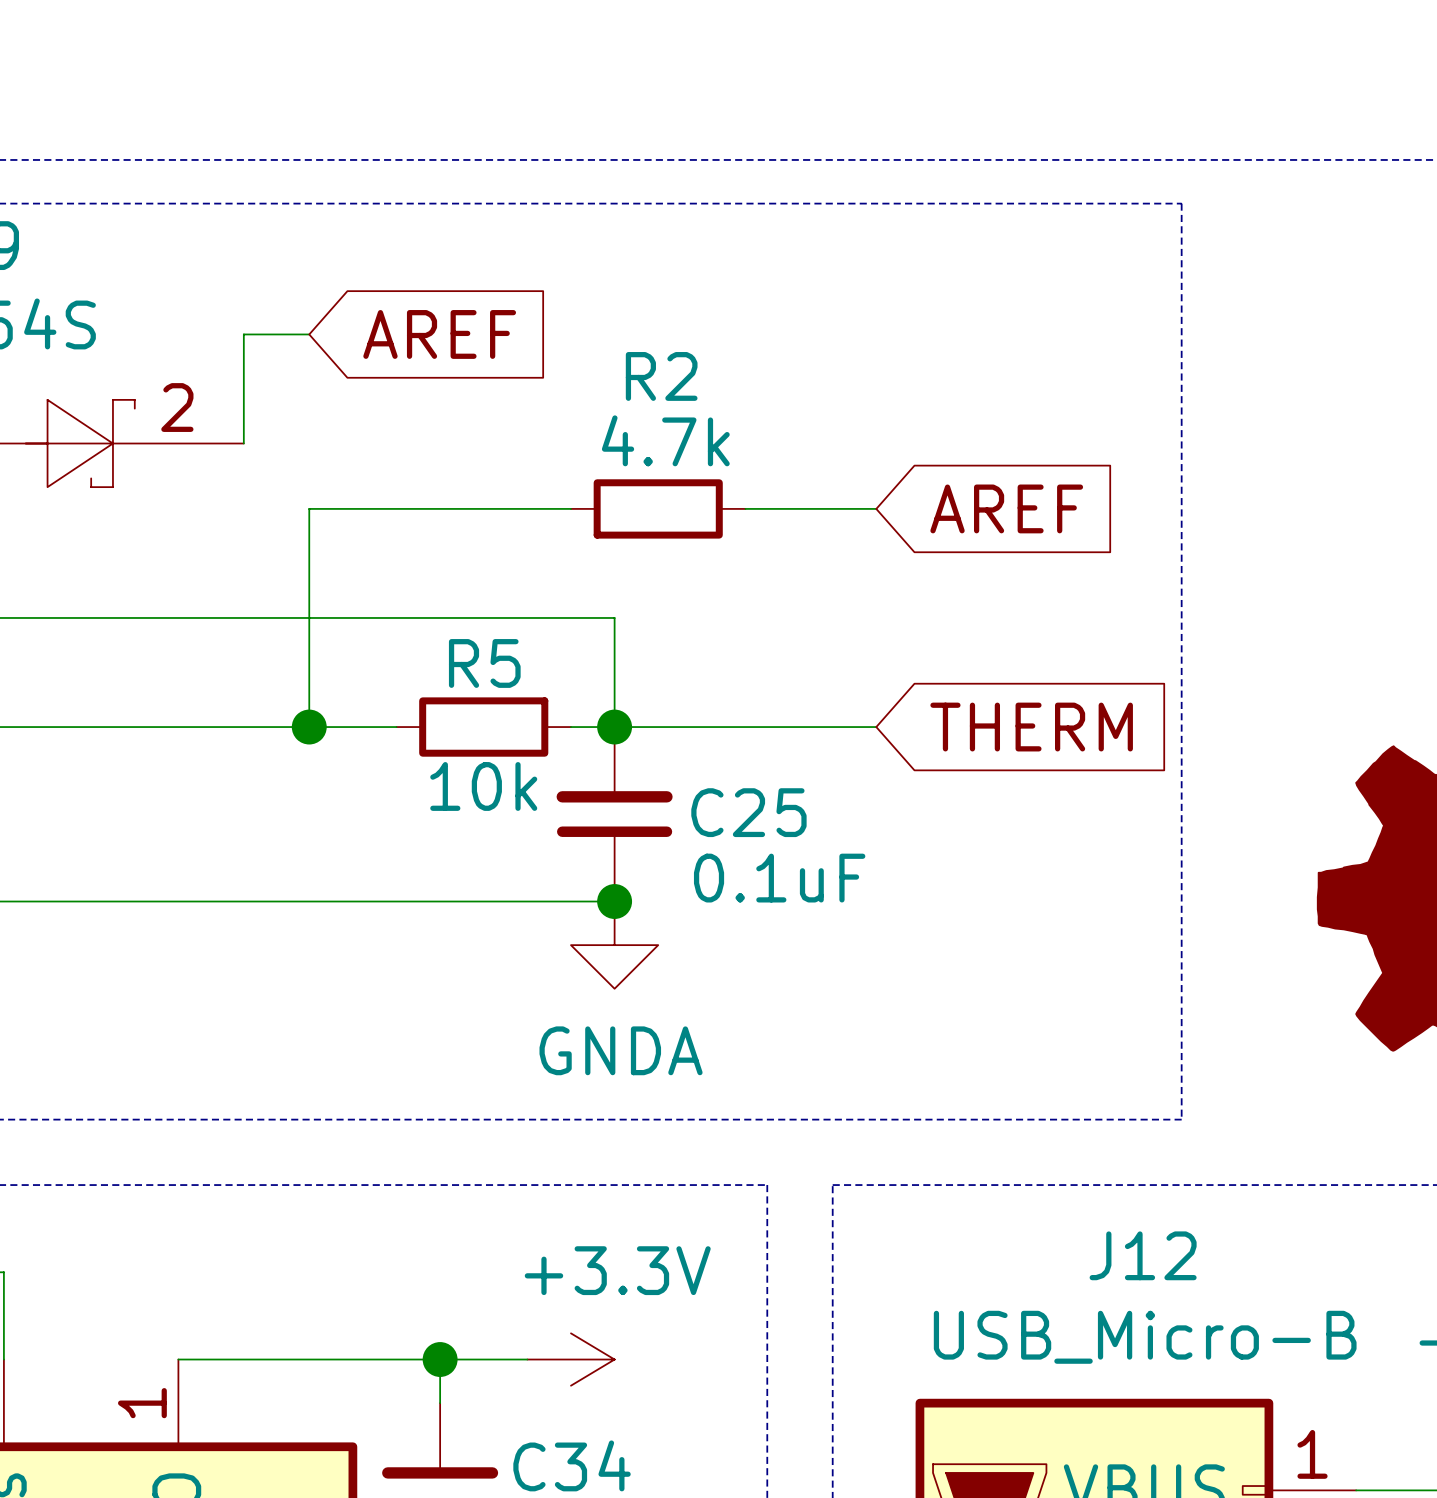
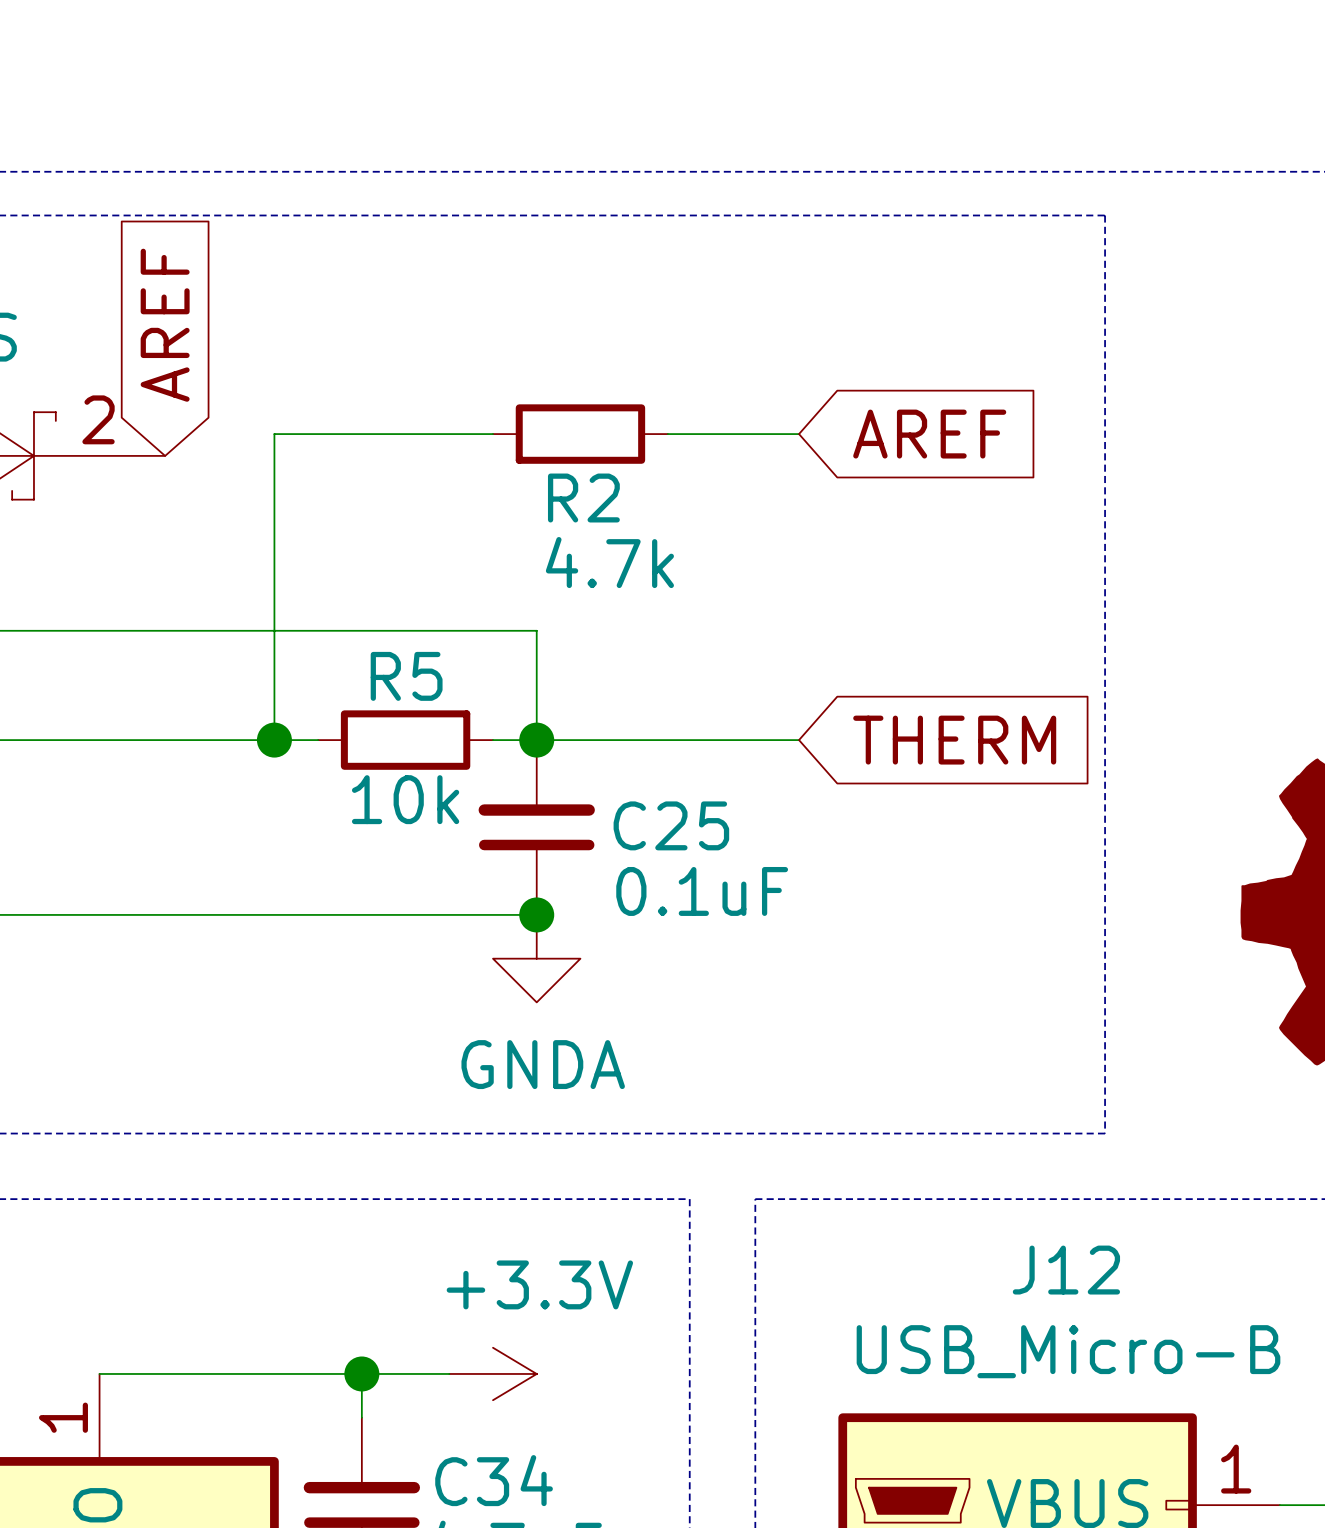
wire: (309, 334) (243, 334) (243, 443) -> none
global label rotation: 0° (439, 334) -> 90° counterclockwise (165, 325)
R2 name position: R2 (661, 376) -> R2 (583, 498)
wire: none -> (493, 434) (274, 434) (274, 740)
R2 value position: 4.7k (665, 440) -> 4.7k (609, 562)
wire: (570, 508) (309, 508) (309, 727) -> none
R2 position: (658, 508) -> (580, 434)
wire: (745, 508) (876, 508) -> (667, 434) (799, 434)
global label position: AREF (1006, 508) -> AREF (929, 434)
junction position: (309, 727) -> (274, 740)

